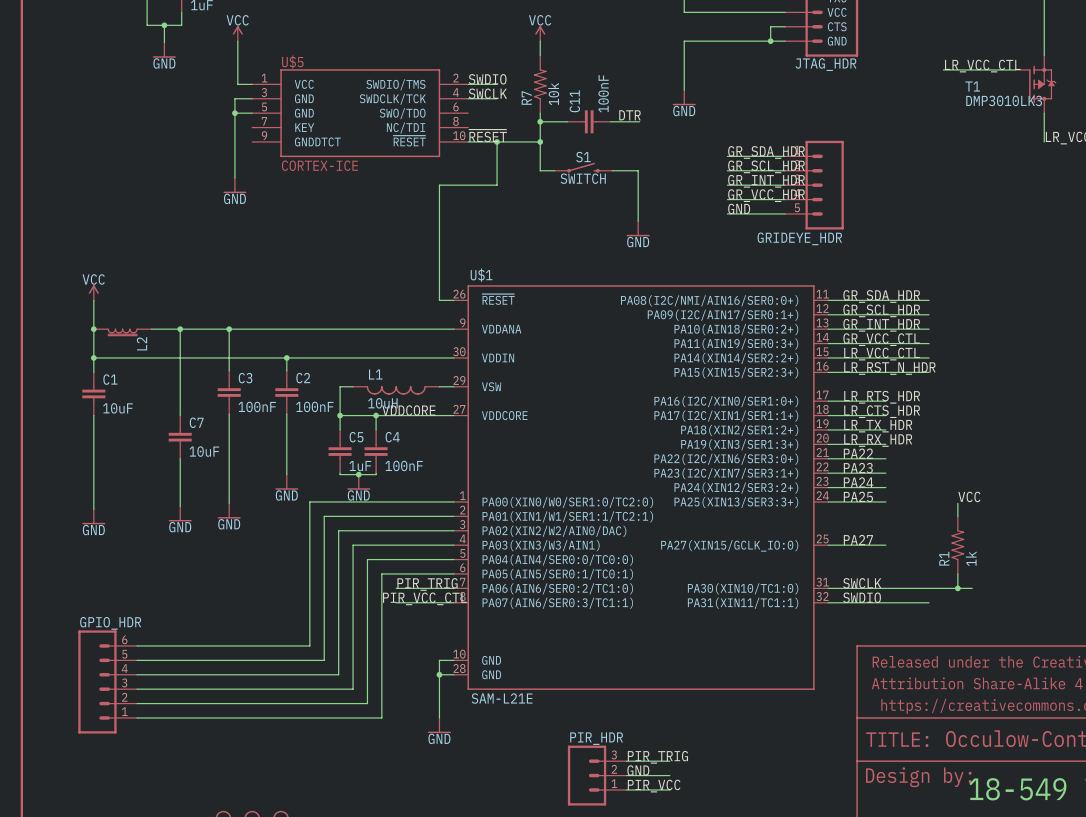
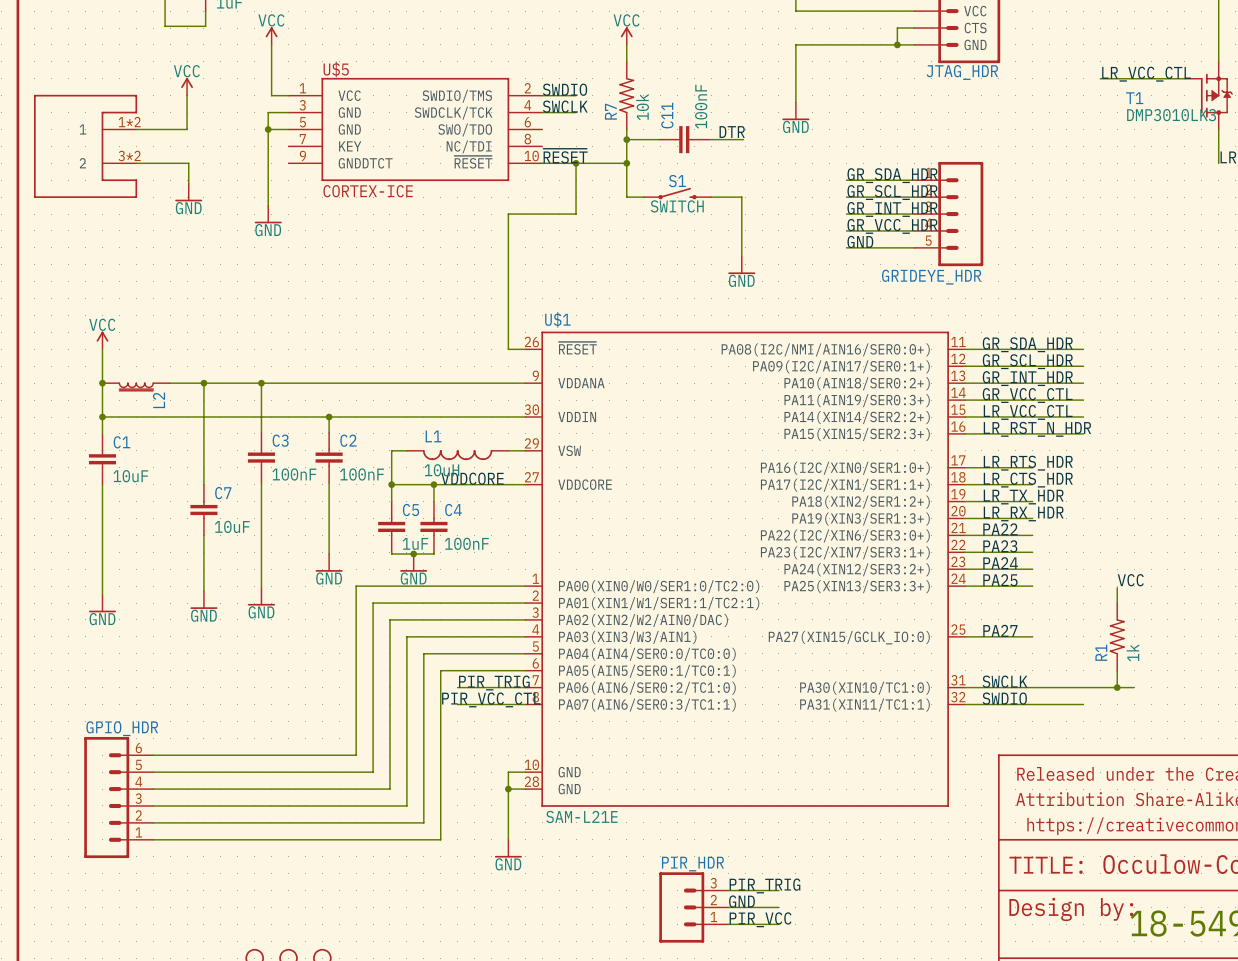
wire: (164, 25) (164, 42) -> none
junction: (164, 25) -> none
power symbol position: GND (164, 50) -> GND (188, 192)
power symbol: none -> VCC (187, 86)
wire: none -> (187, 95) (187, 129) (136, 129)
part: none -> (85, 146)
wire: none -> (136, 163) (188, 163) (188, 183)

